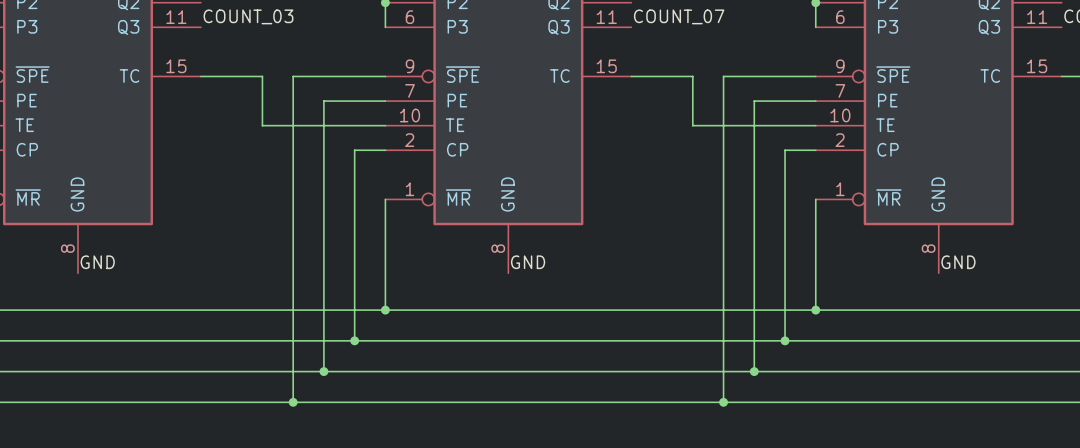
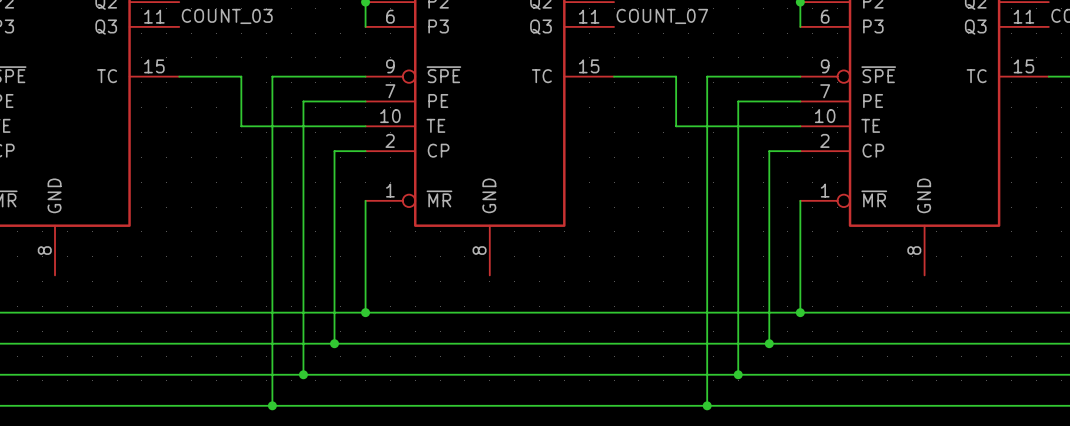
label: GND (97, 262) -> none
label: GND (528, 262) -> none
label: GND (958, 262) -> none

